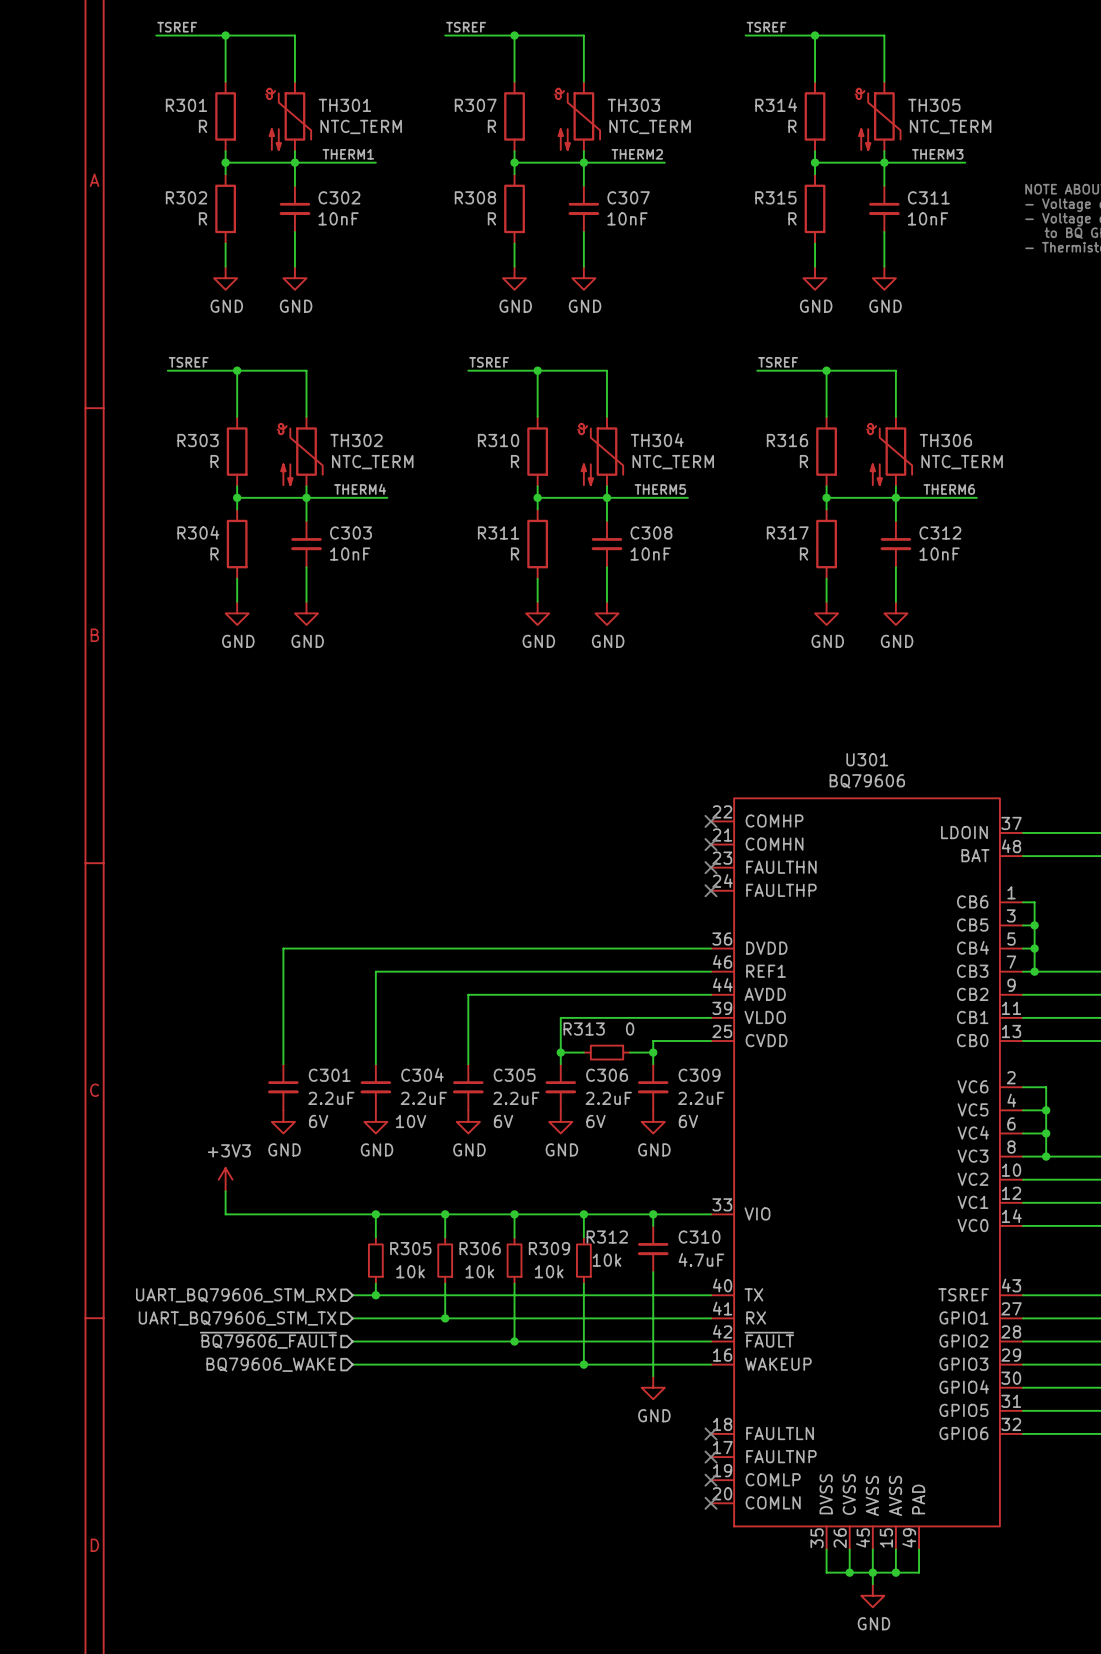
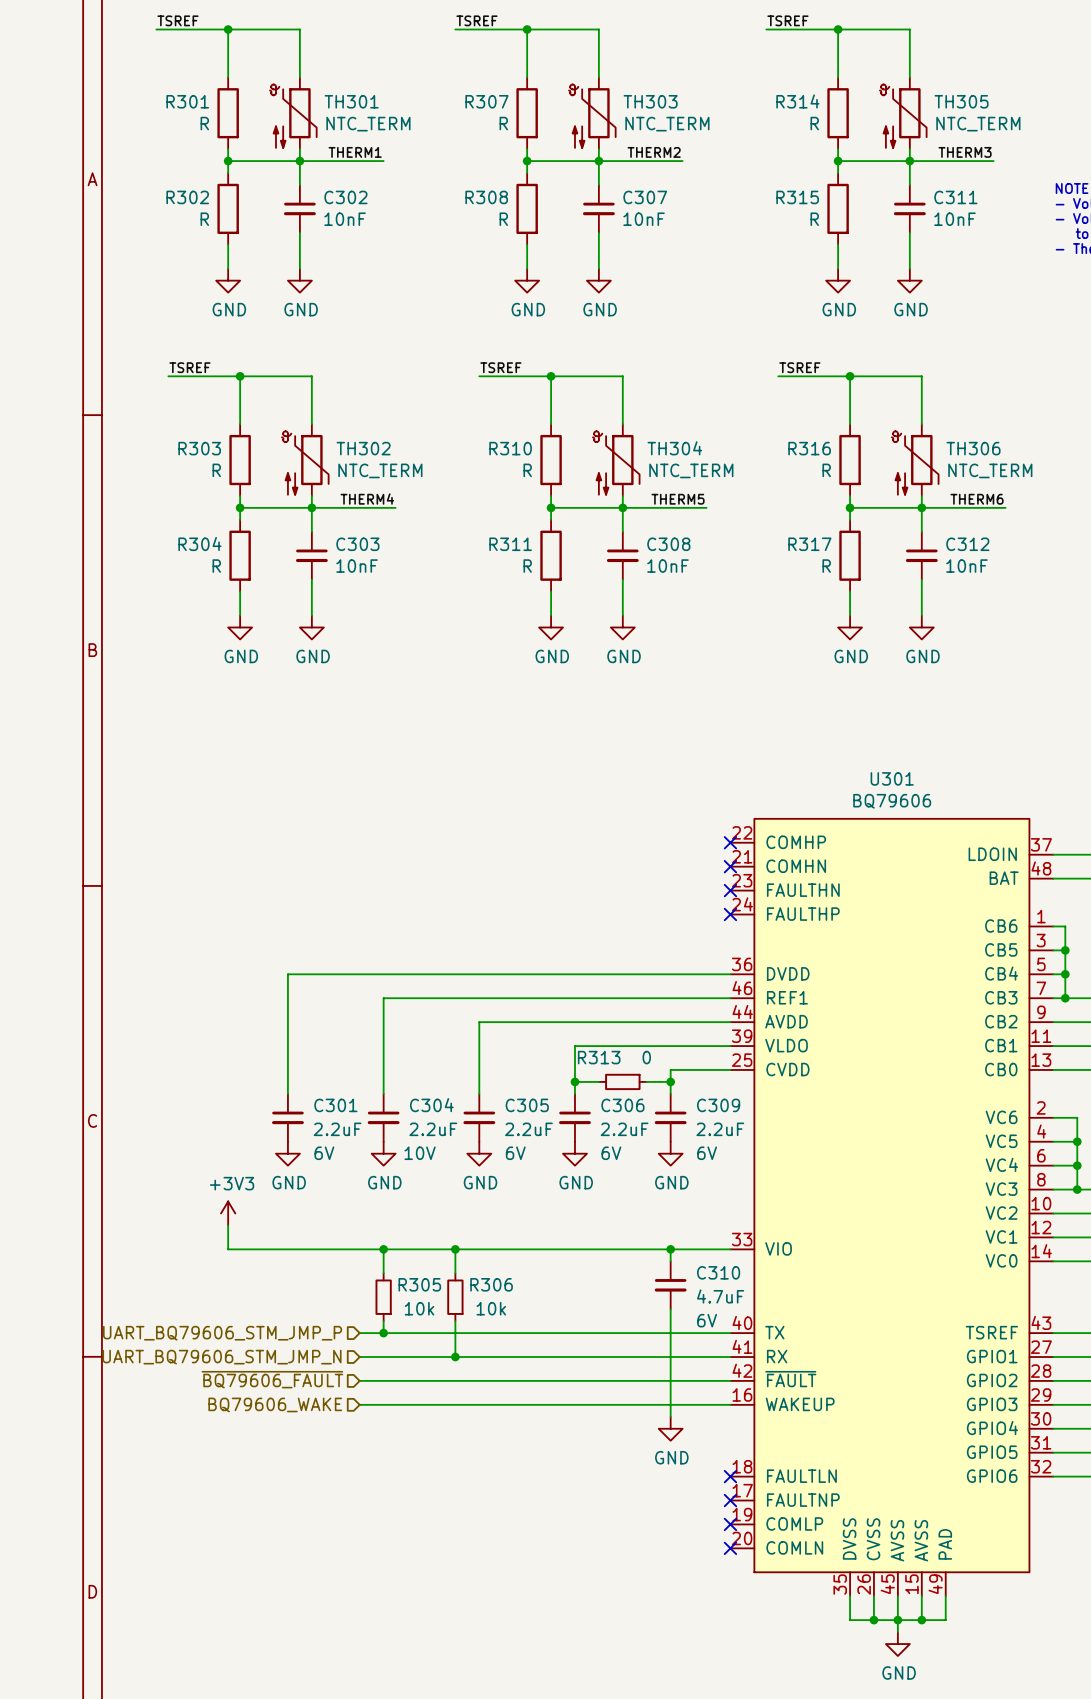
wire: (514, 1214) (514, 1237) -> none
junction: (514, 1214) -> none
wire: (583, 1214) (583, 1237) -> none
junction: (583, 1214) -> none
R309: 10k (514, 1260) -> none
R312: 10k (583, 1260) -> none
wire: (514, 1283) (514, 1341) -> none
wire: (583, 1283) (583, 1364) -> none
C310 text: none -> 6V (707, 1320)
hierarchical label: UART_BQ79606_STM_RX (236, 1295) -> UART_BQ79606_STM_JMP_P (222, 1333)
hierarchical label: UART_BQ79606_STM_TX (237, 1318) -> UART_BQ79606_STM_JMP_N (221, 1357)
junction: (514, 1341) -> none
junction: (583, 1364) -> none

